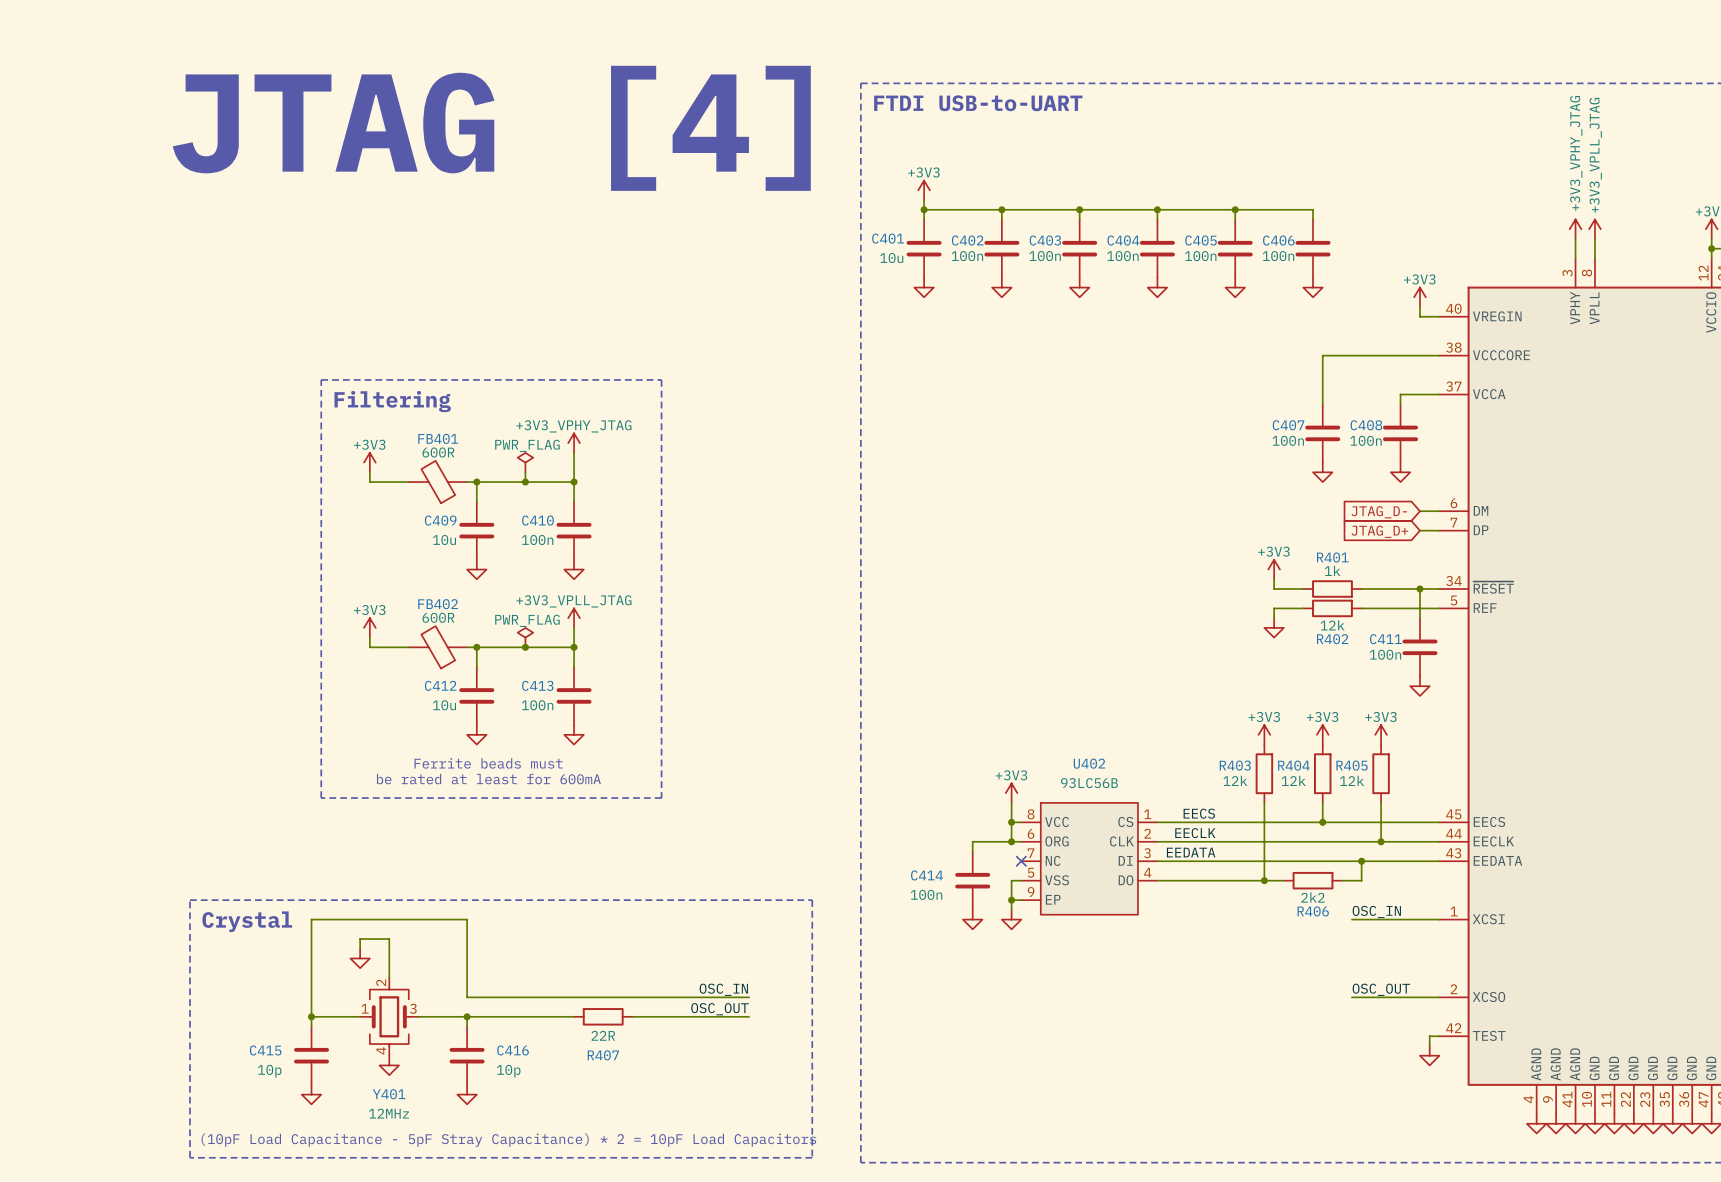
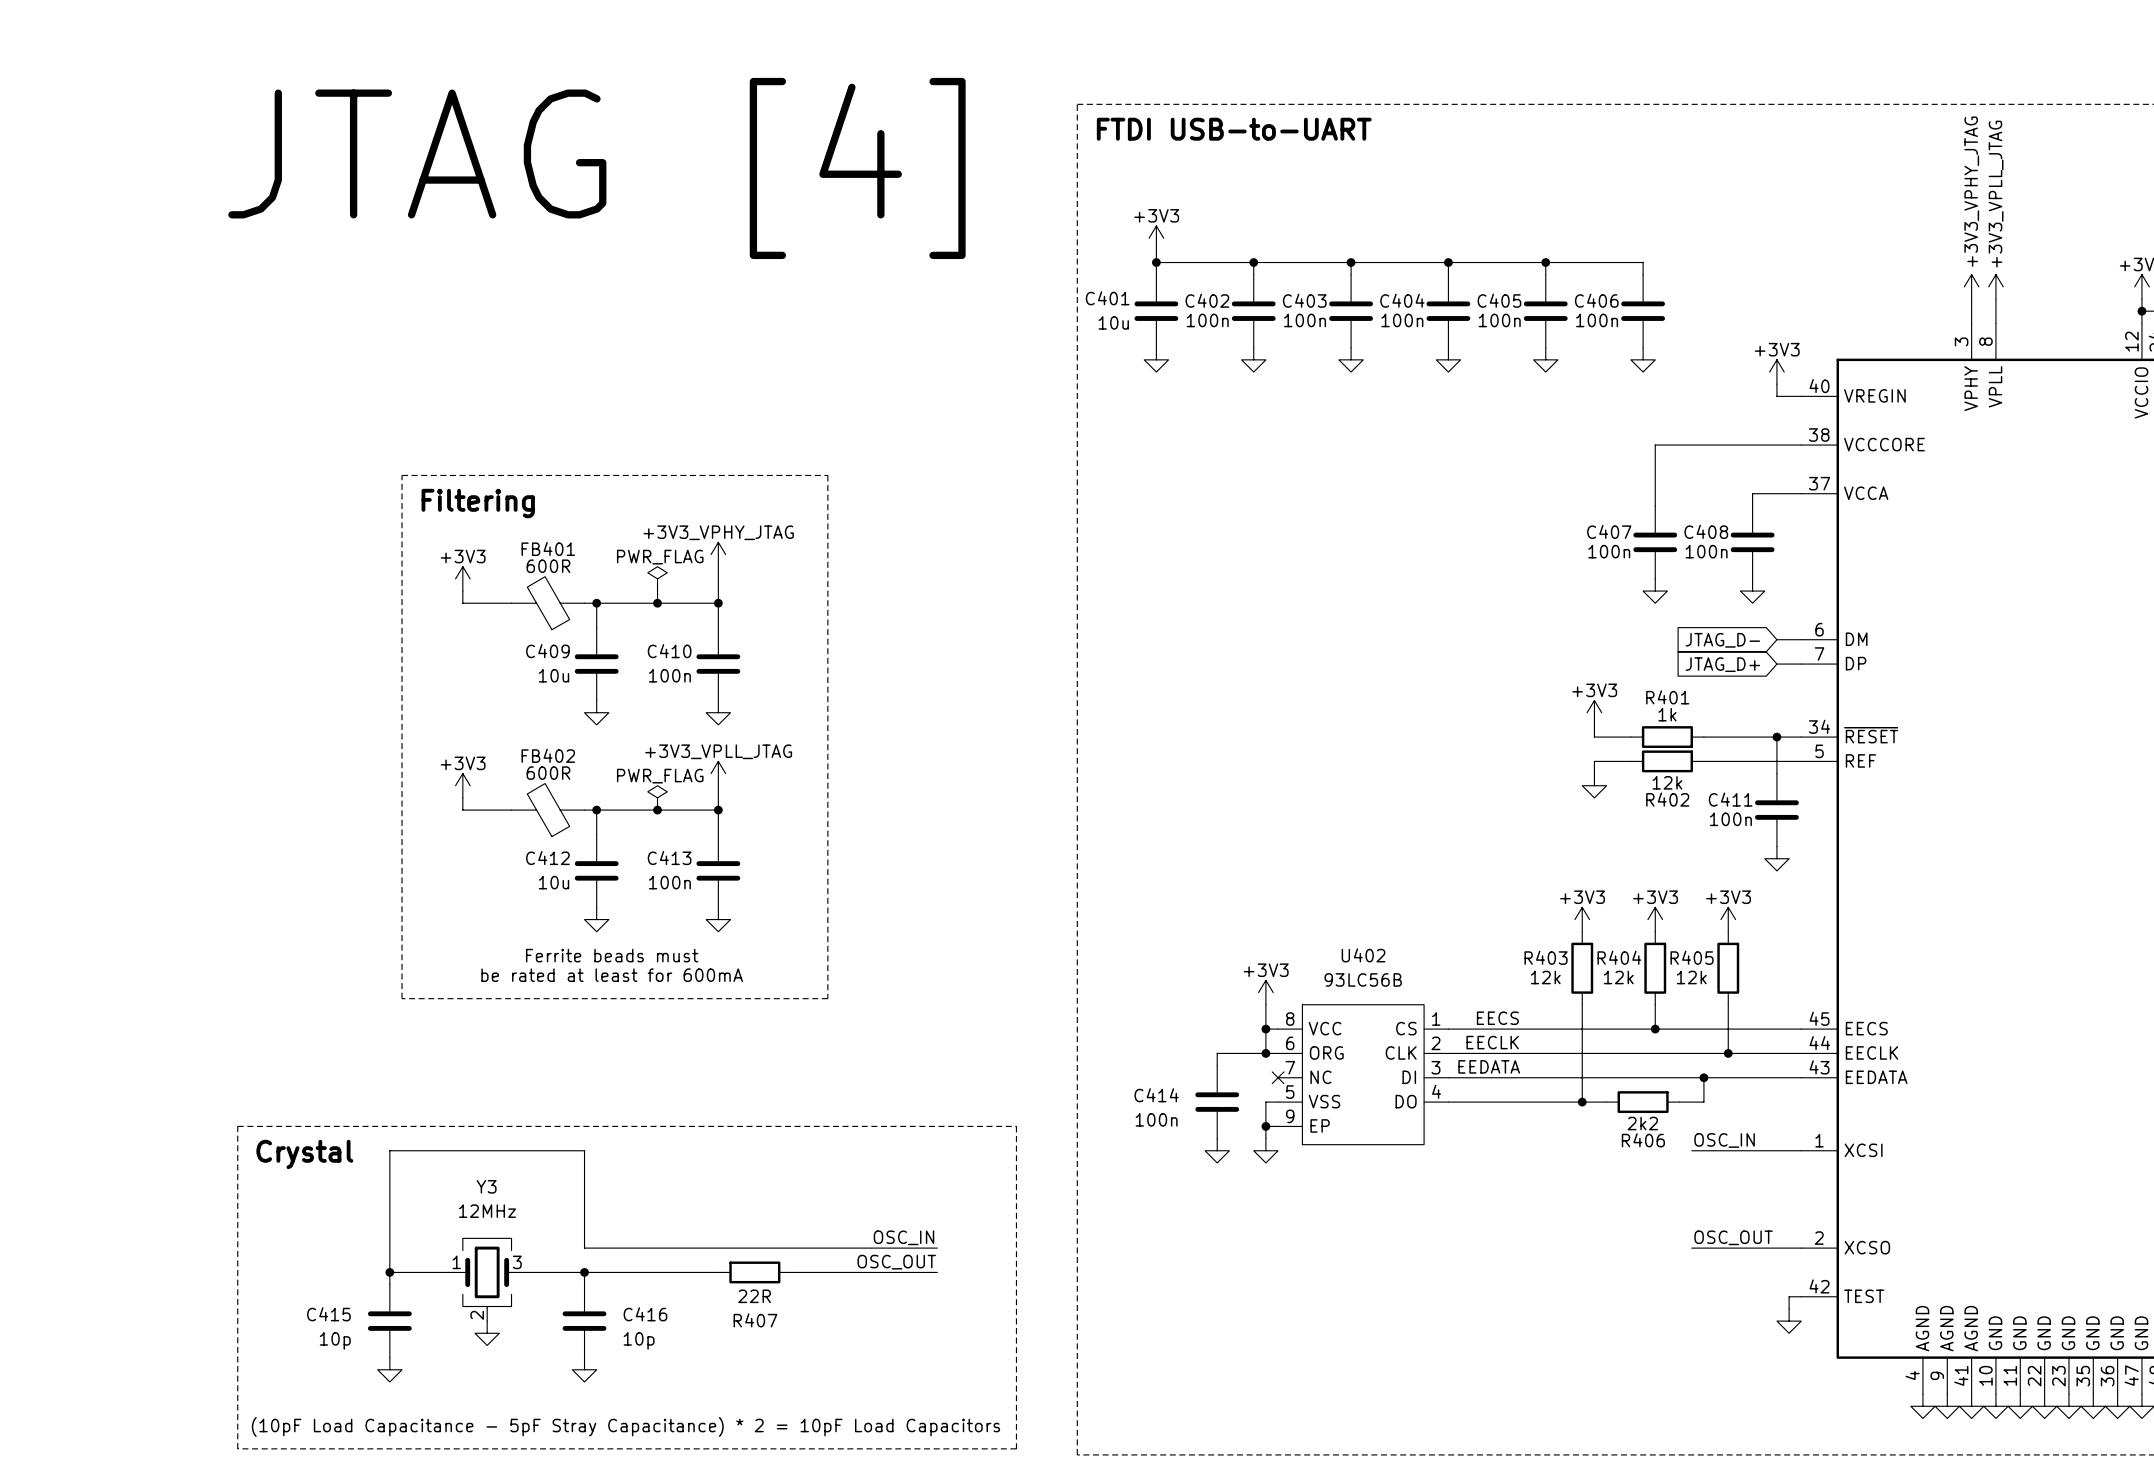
wire: (360, 948) (360, 939) (389, 939) (389, 977) -> none
power symbol: (360, 958) -> none
Y401: 12MHz (389, 1016) -> none
Y3: none -> 12MHz (487, 1279)

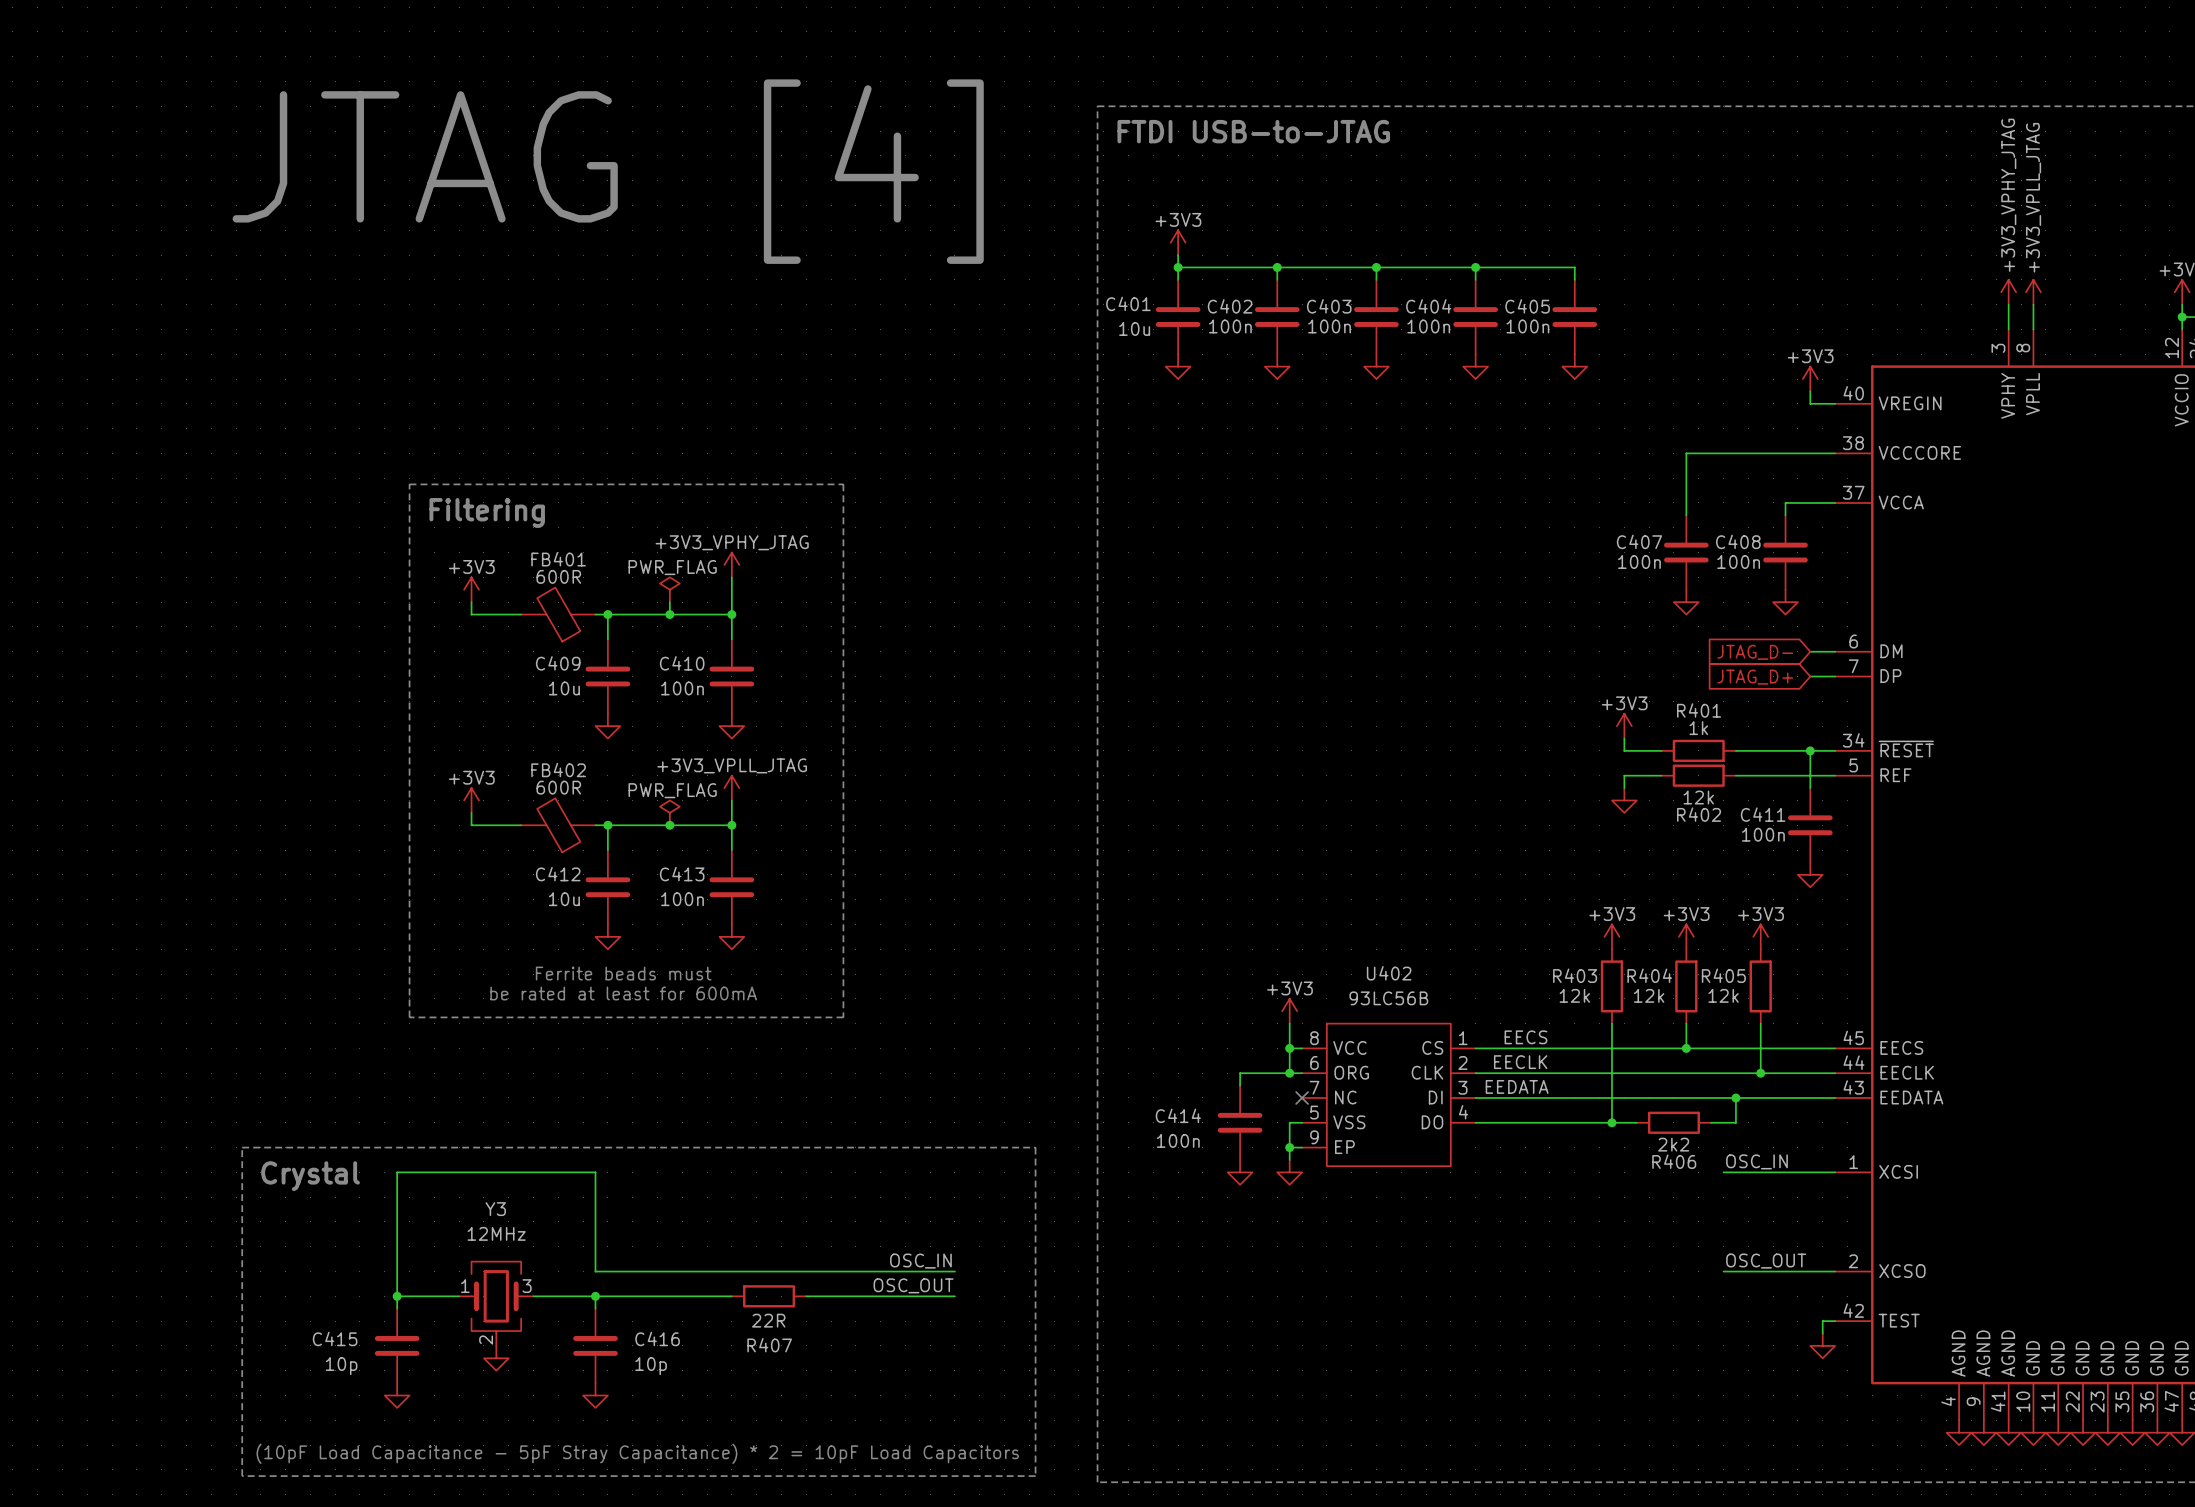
text: FTDI USB-to-UART (1234, 129) -> FTDI USB-to-JTAG (1253, 131)
wire: (1545, 262) (1643, 262) (1643, 274) -> none
junction: (1545, 262) -> none
C406: 100n (1643, 311) -> none
power symbol: (1643, 359) -> none

